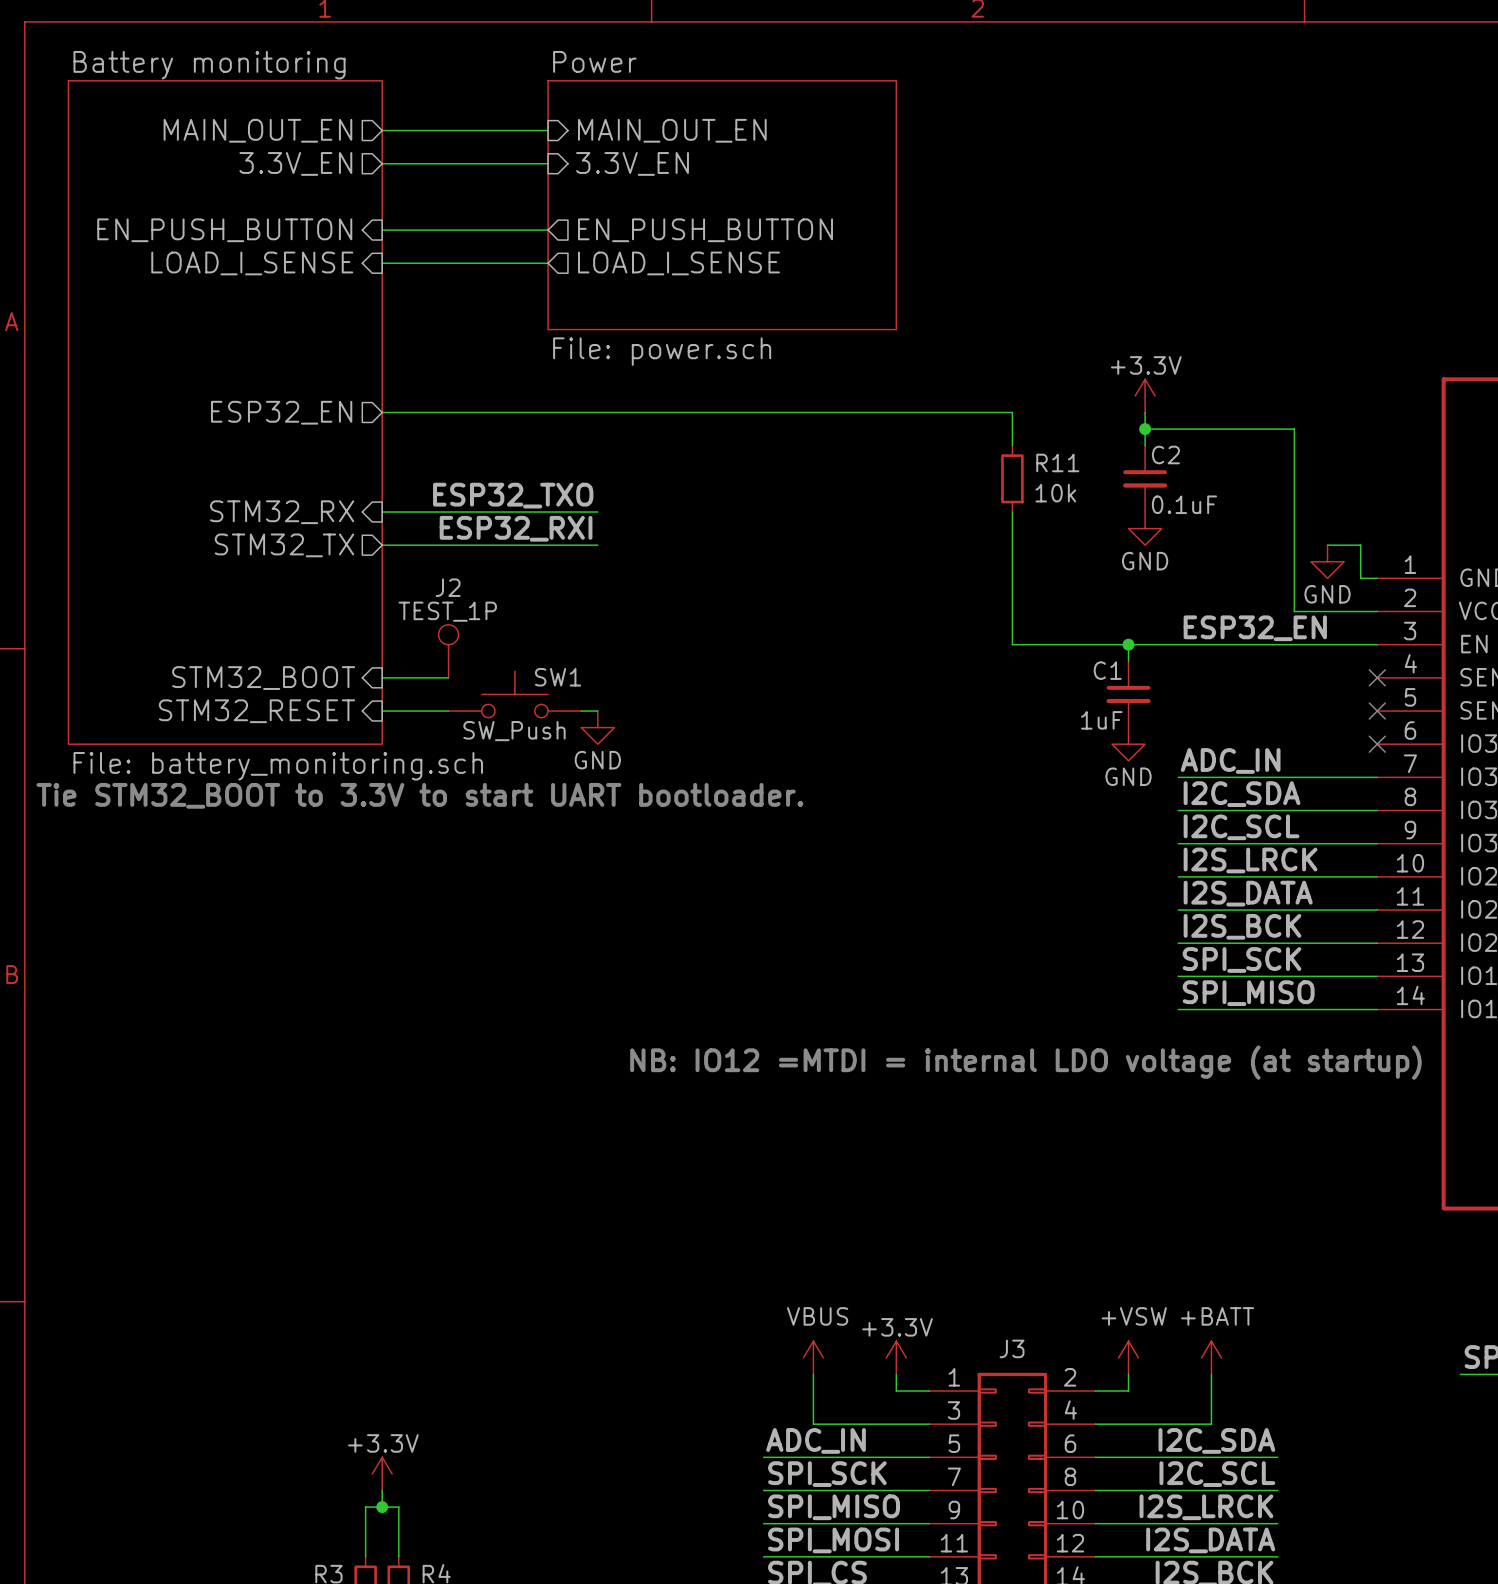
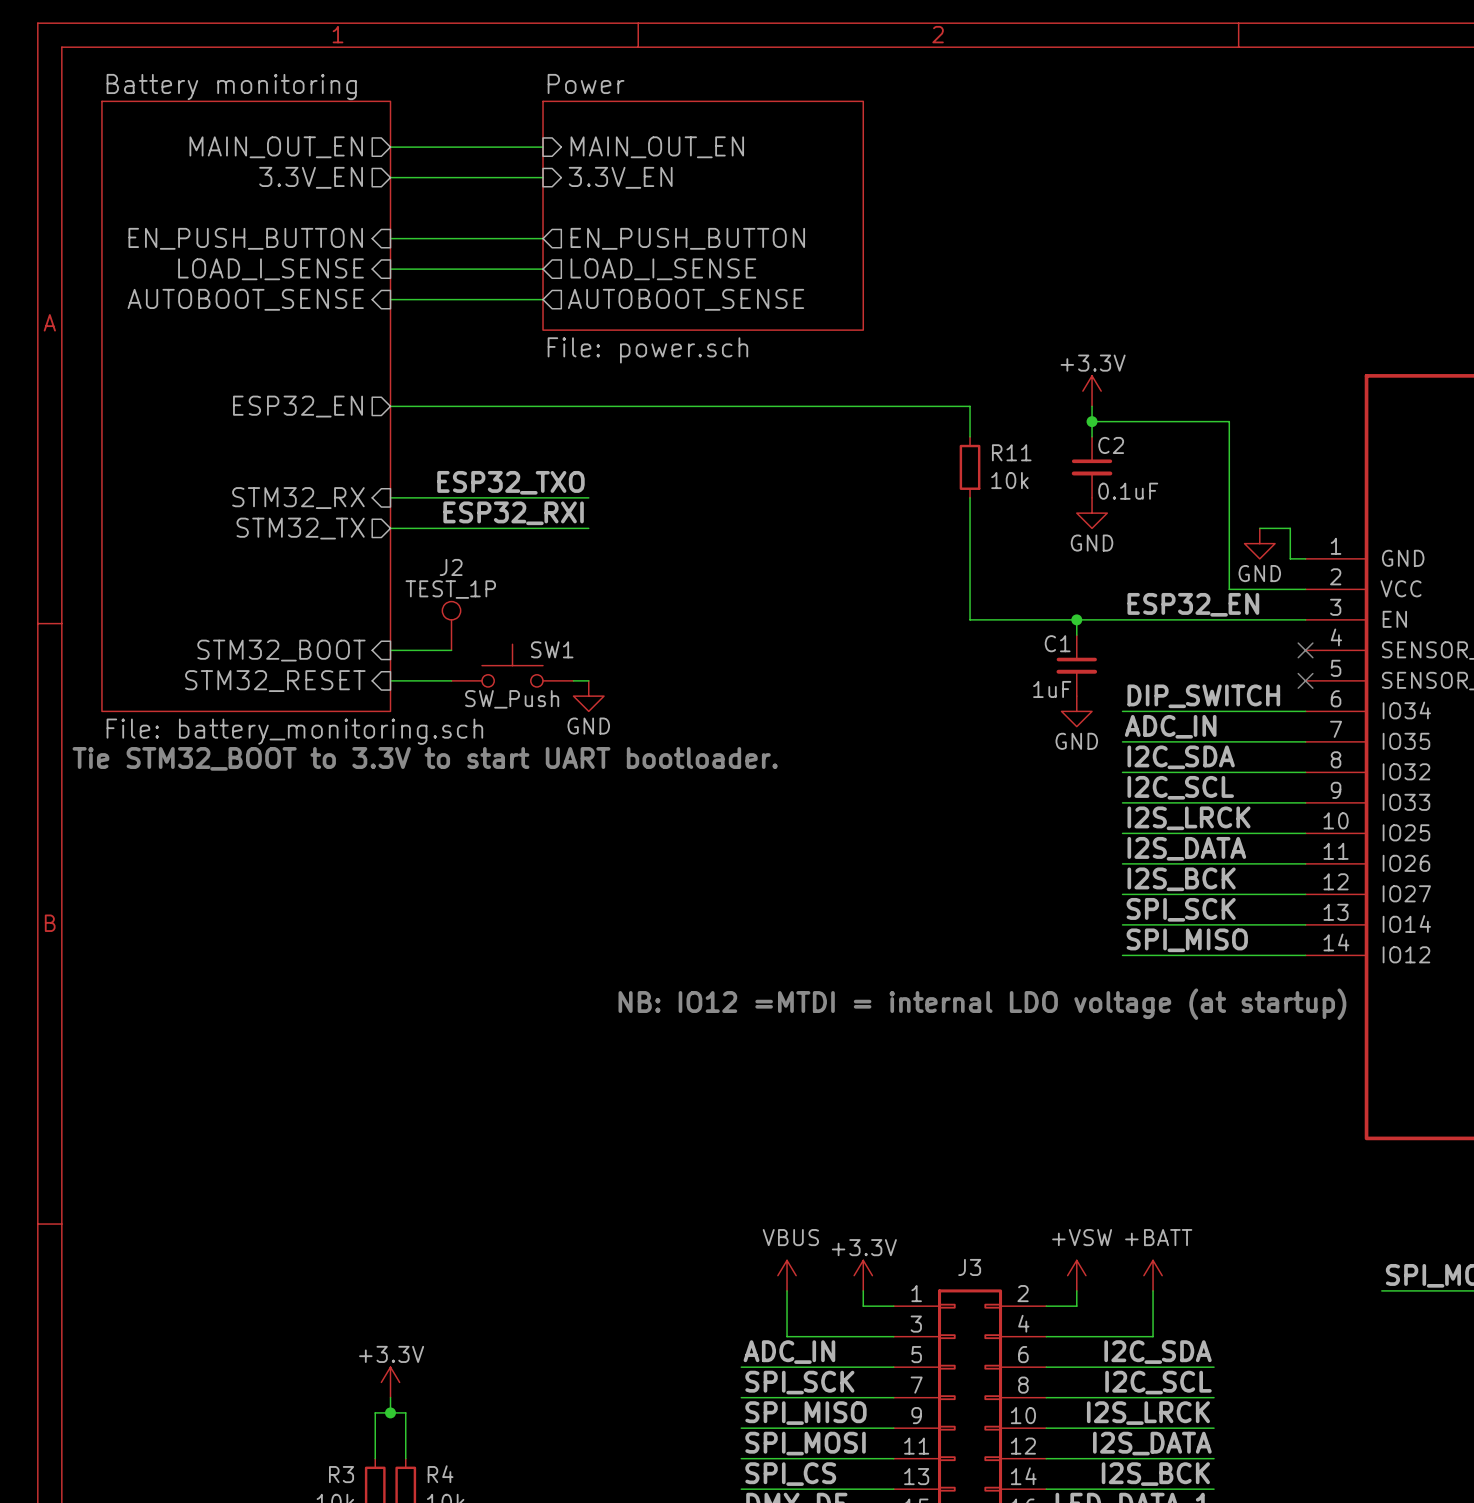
sheet pin: none -> AUTOBOOT_SENSE (245, 299)
wire: none -> (390, 299) (543, 299)
sheet pin: none -> AUTOBOOT_SENSE (686, 299)
label: none -> DIP_SWITCH (1203, 696)
wire: none -> (1122, 711) (1305, 711)
no-connect mark: (1377, 744) -> none

